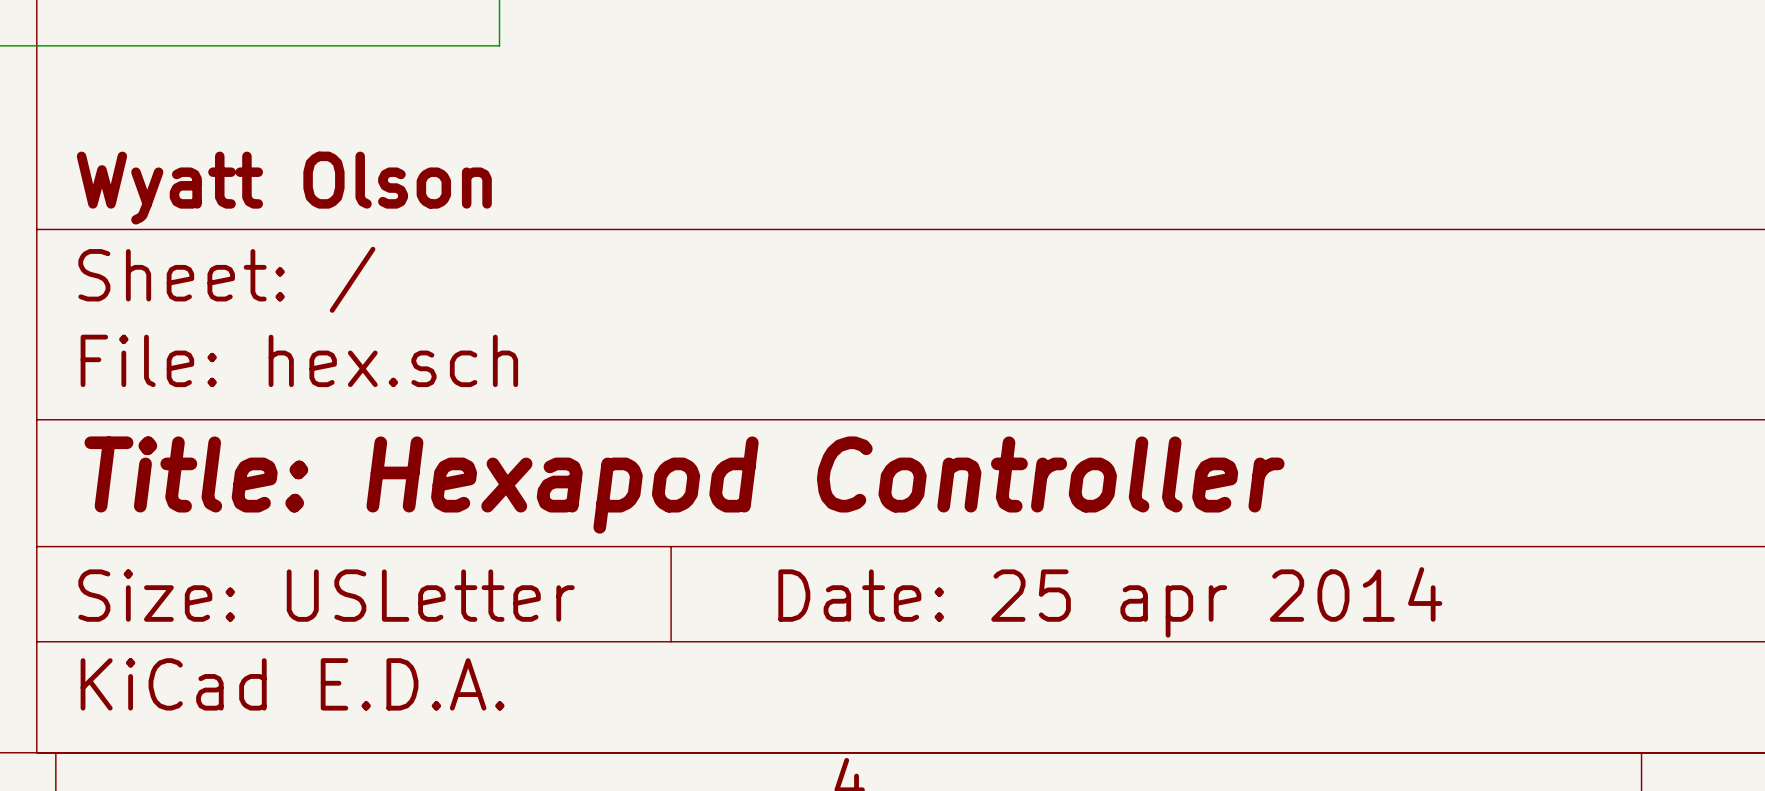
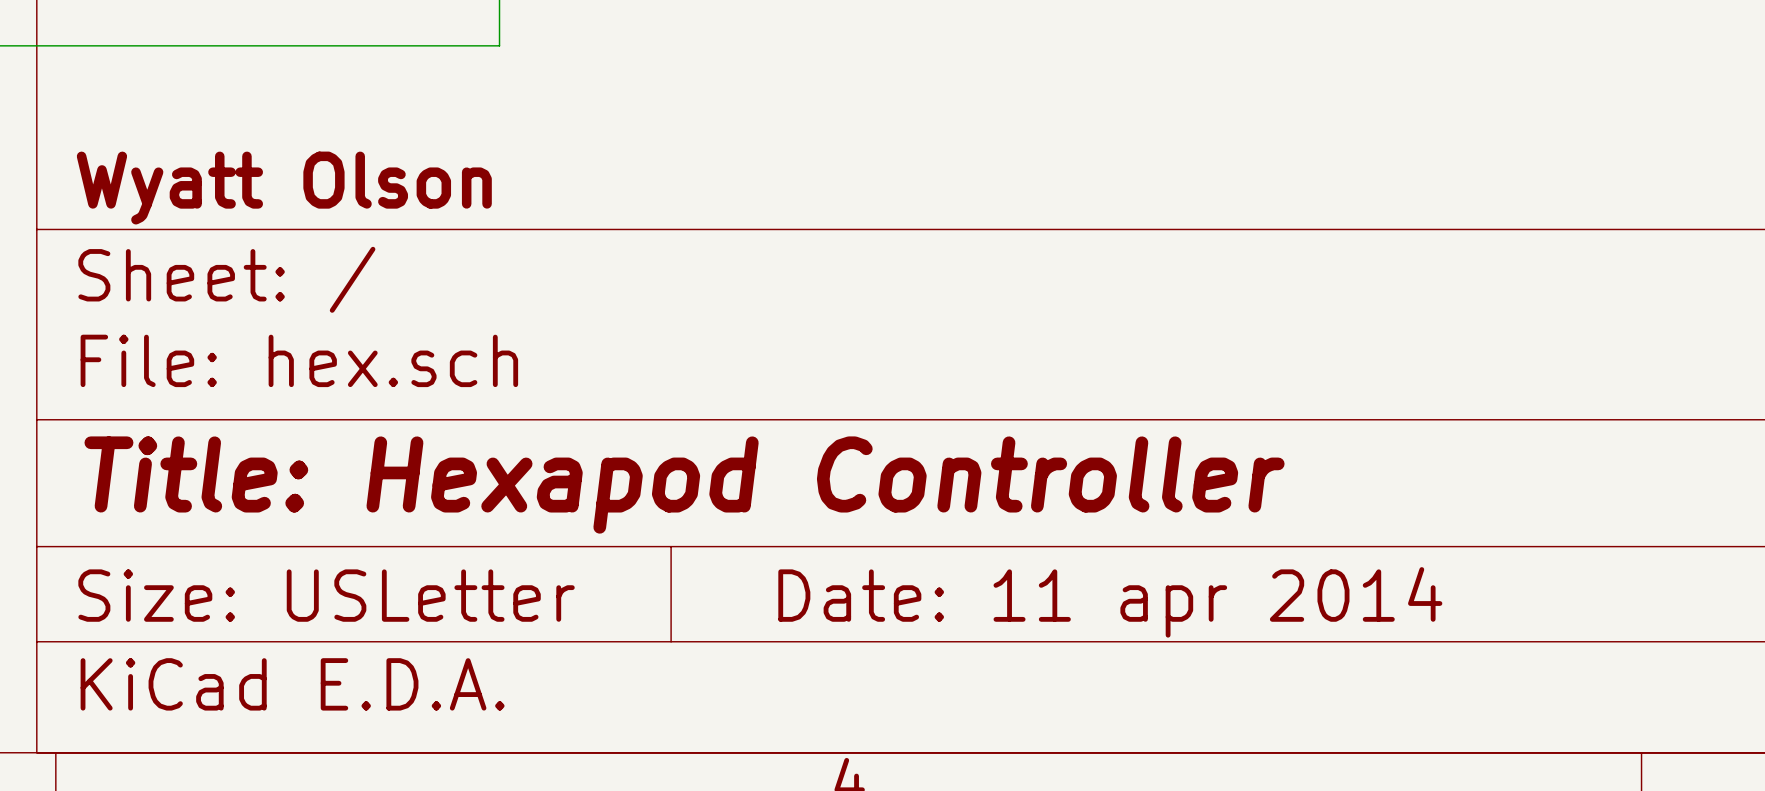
title block: Date: 25 apr 2014 (1110, 602) -> Date: 11 apr 2014 (1110, 602)

